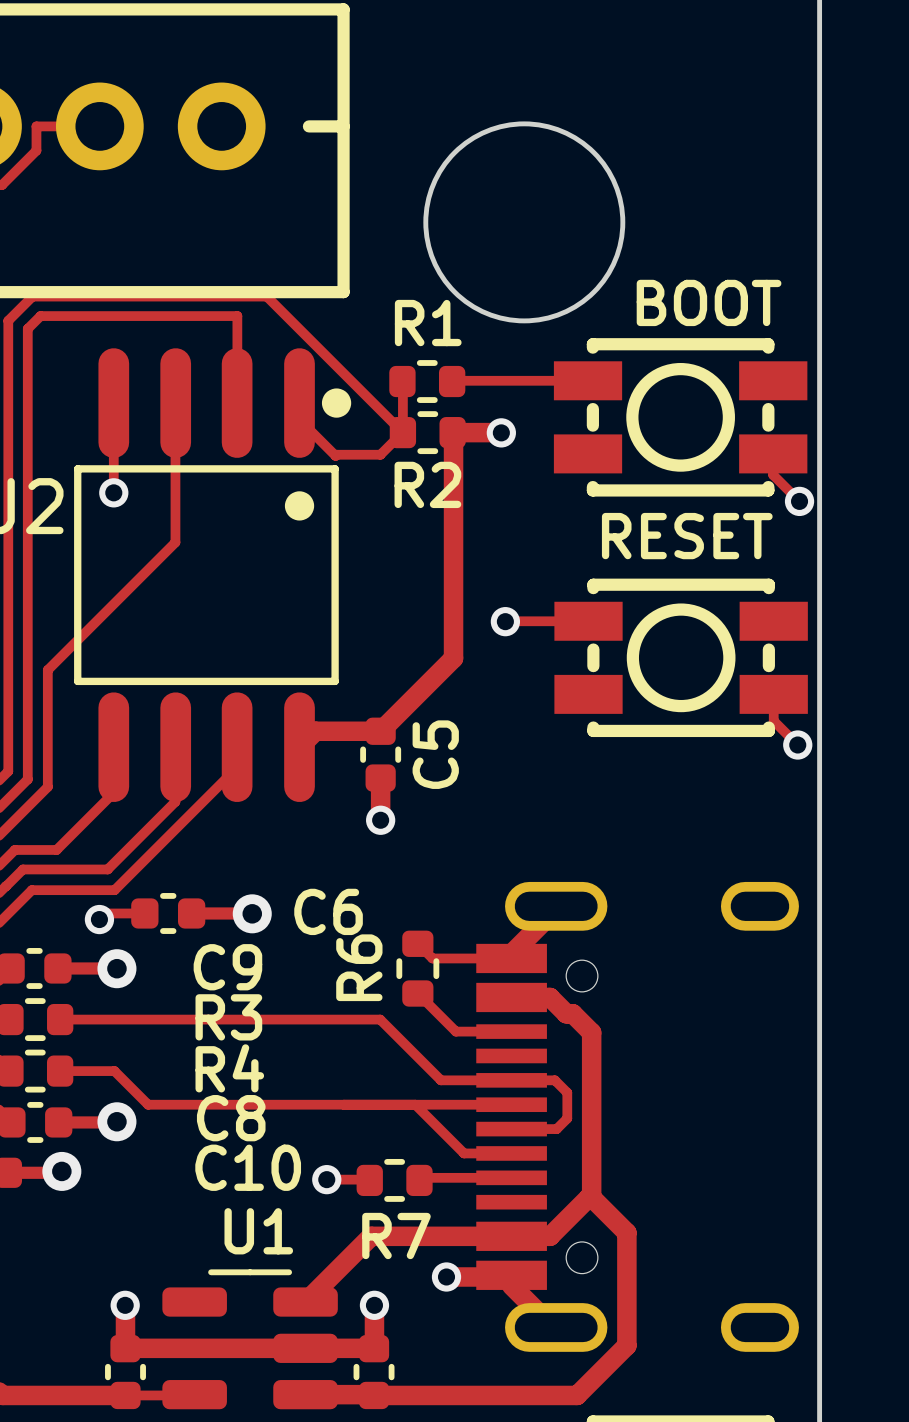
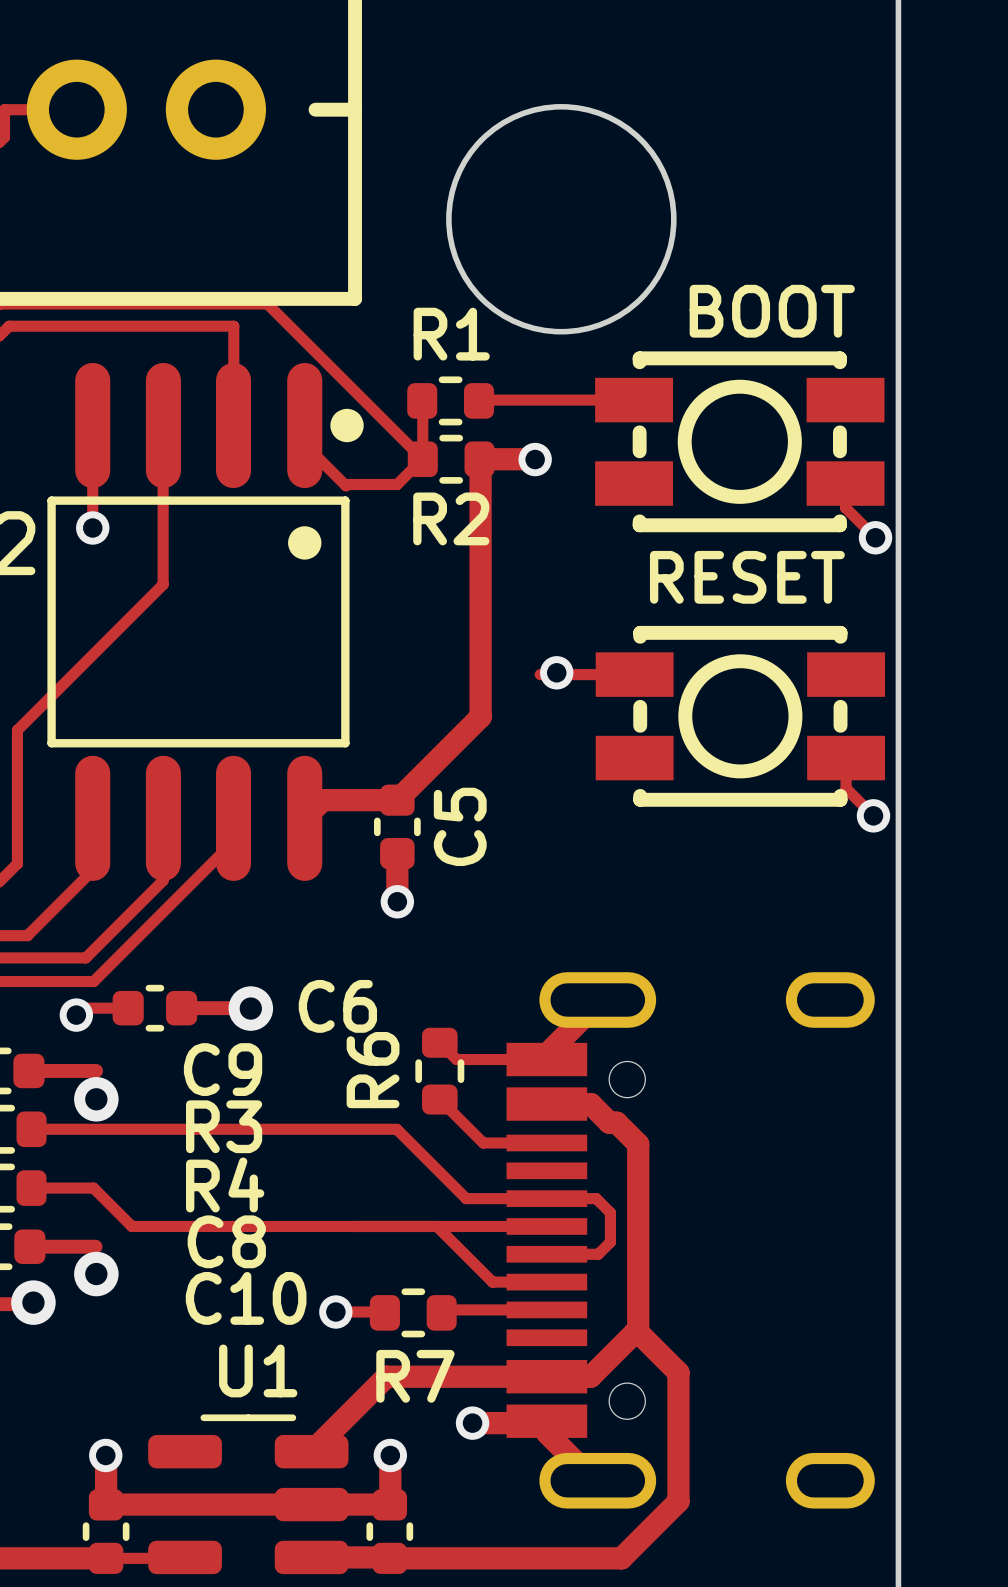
via position: (505, 621) -> (556, 672)
via position: (116, 968) -> (96, 1099)
via position: (116, 1121) -> (96, 1274)

